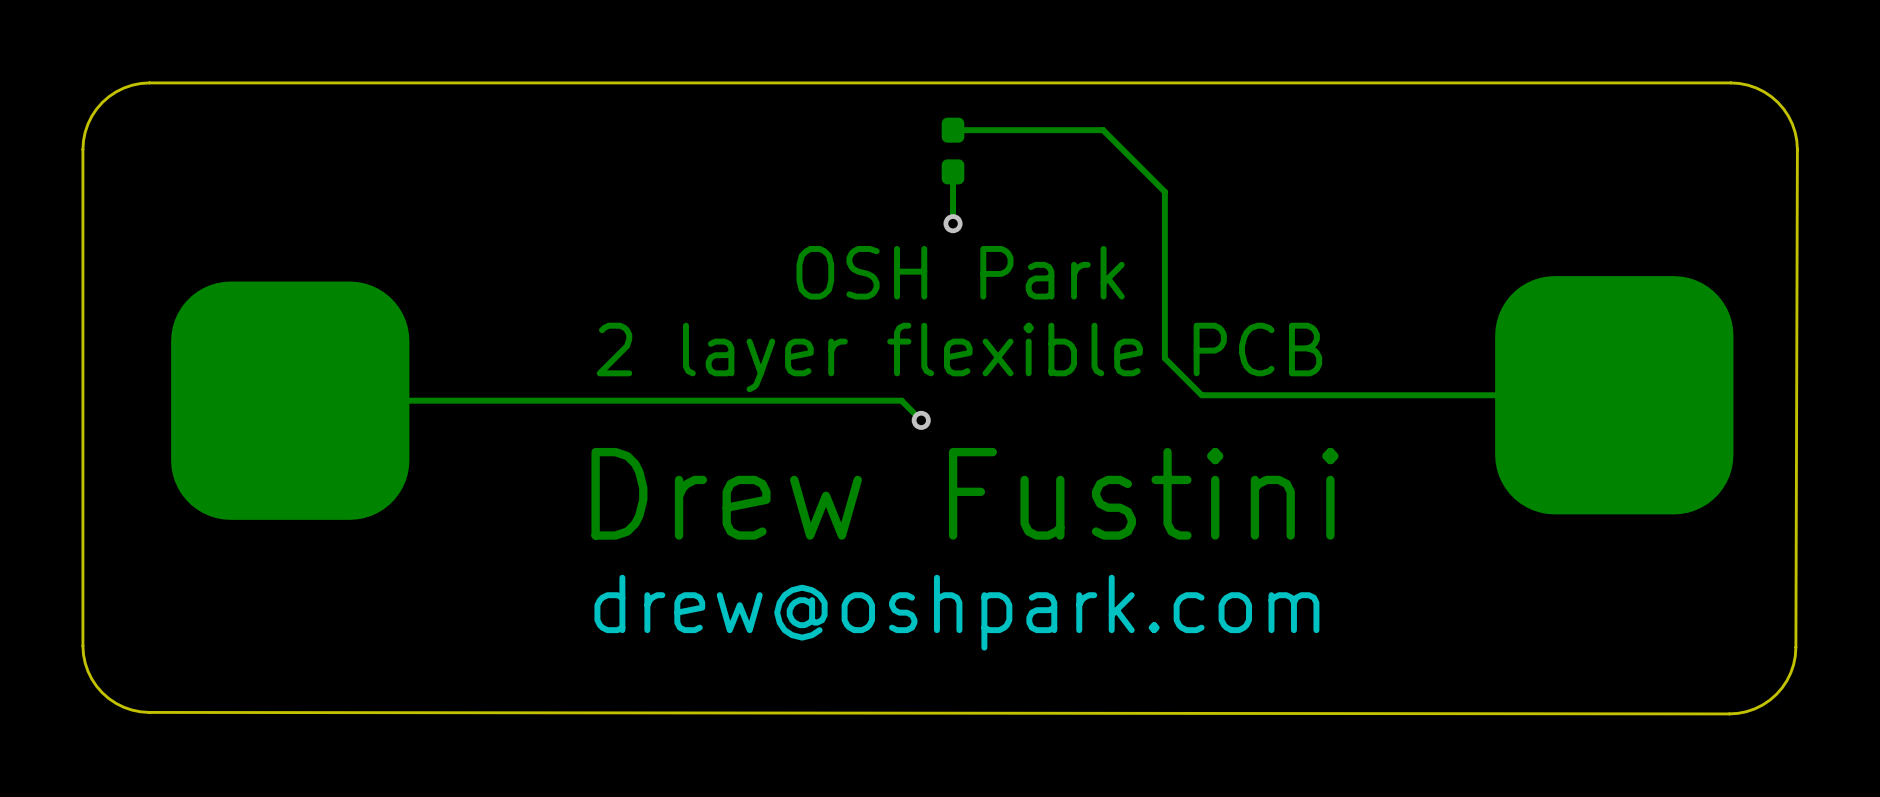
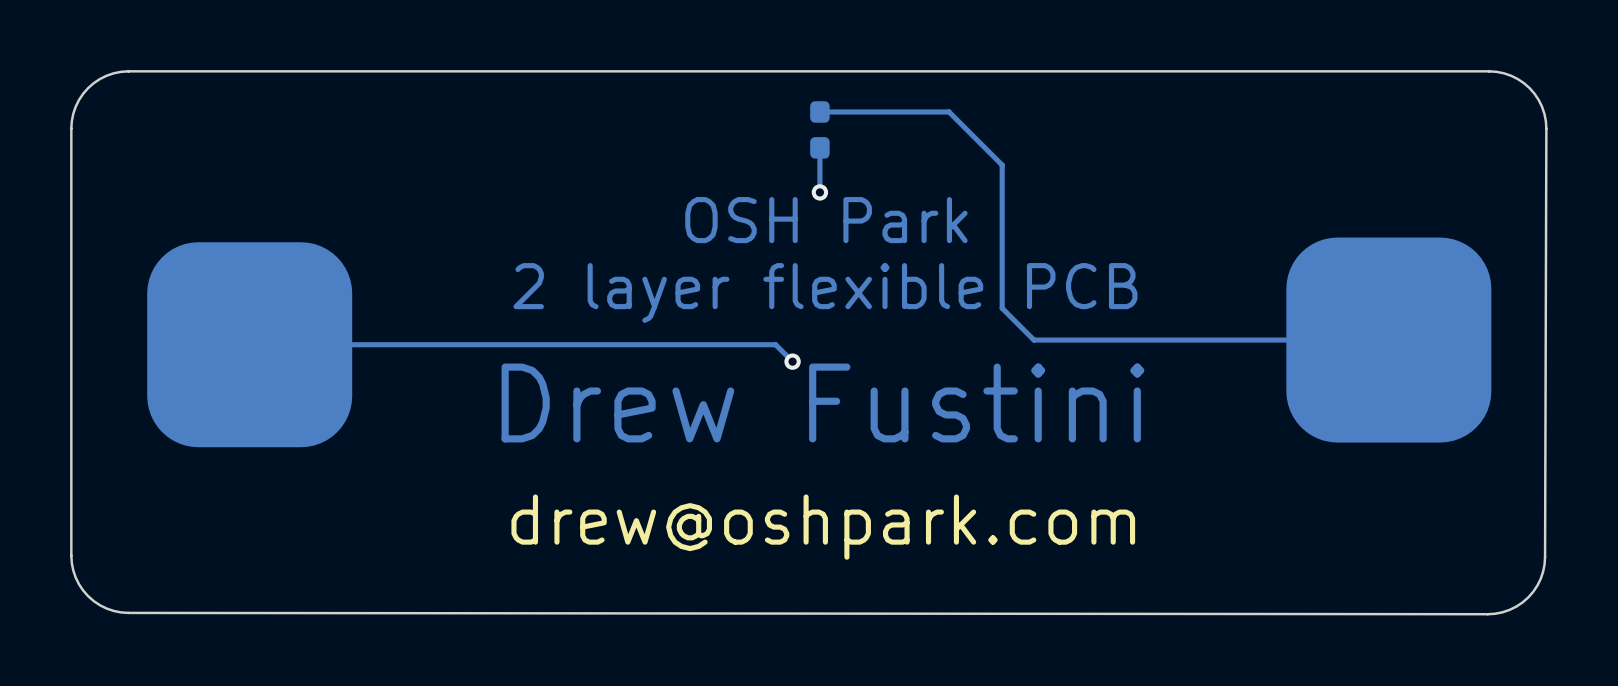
text position: OSH Park (960, 272) -> OSH Park (826, 220)
text position: 2 layer flexible PCB (959, 357) -> 2 layer flexible PCB (825, 292)
text position: Drew Fustini (965, 493) -> Drew Fustini (822, 402)

